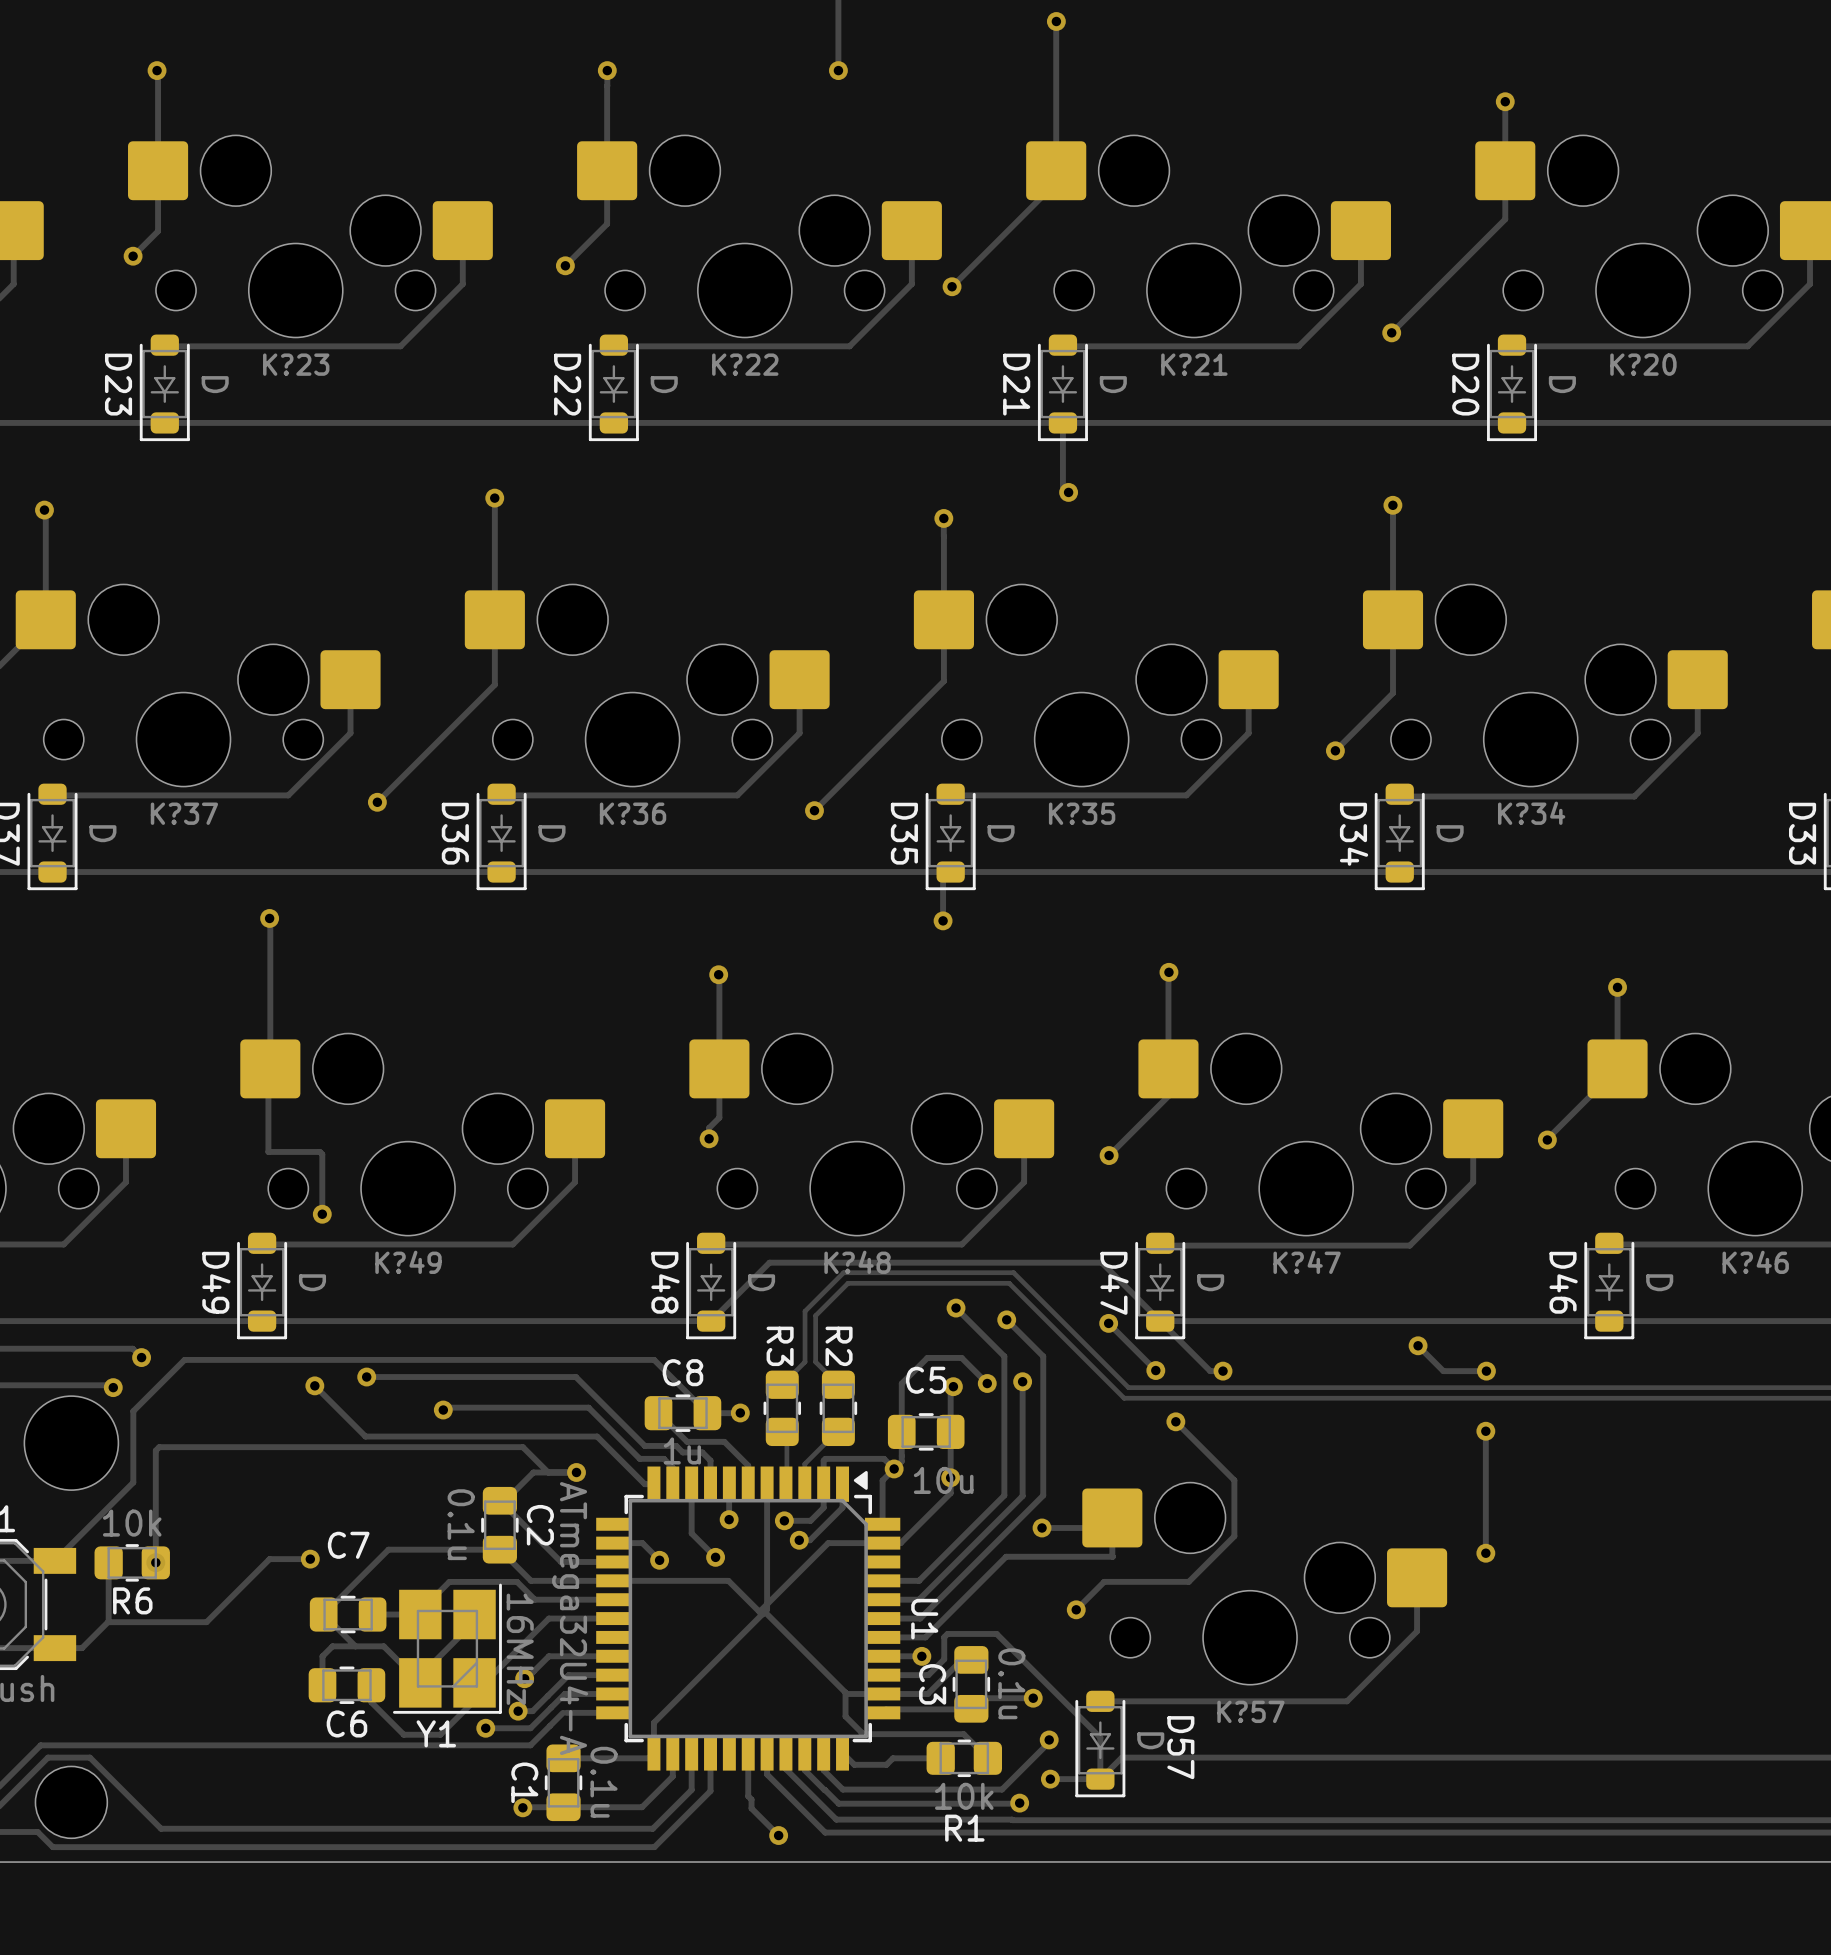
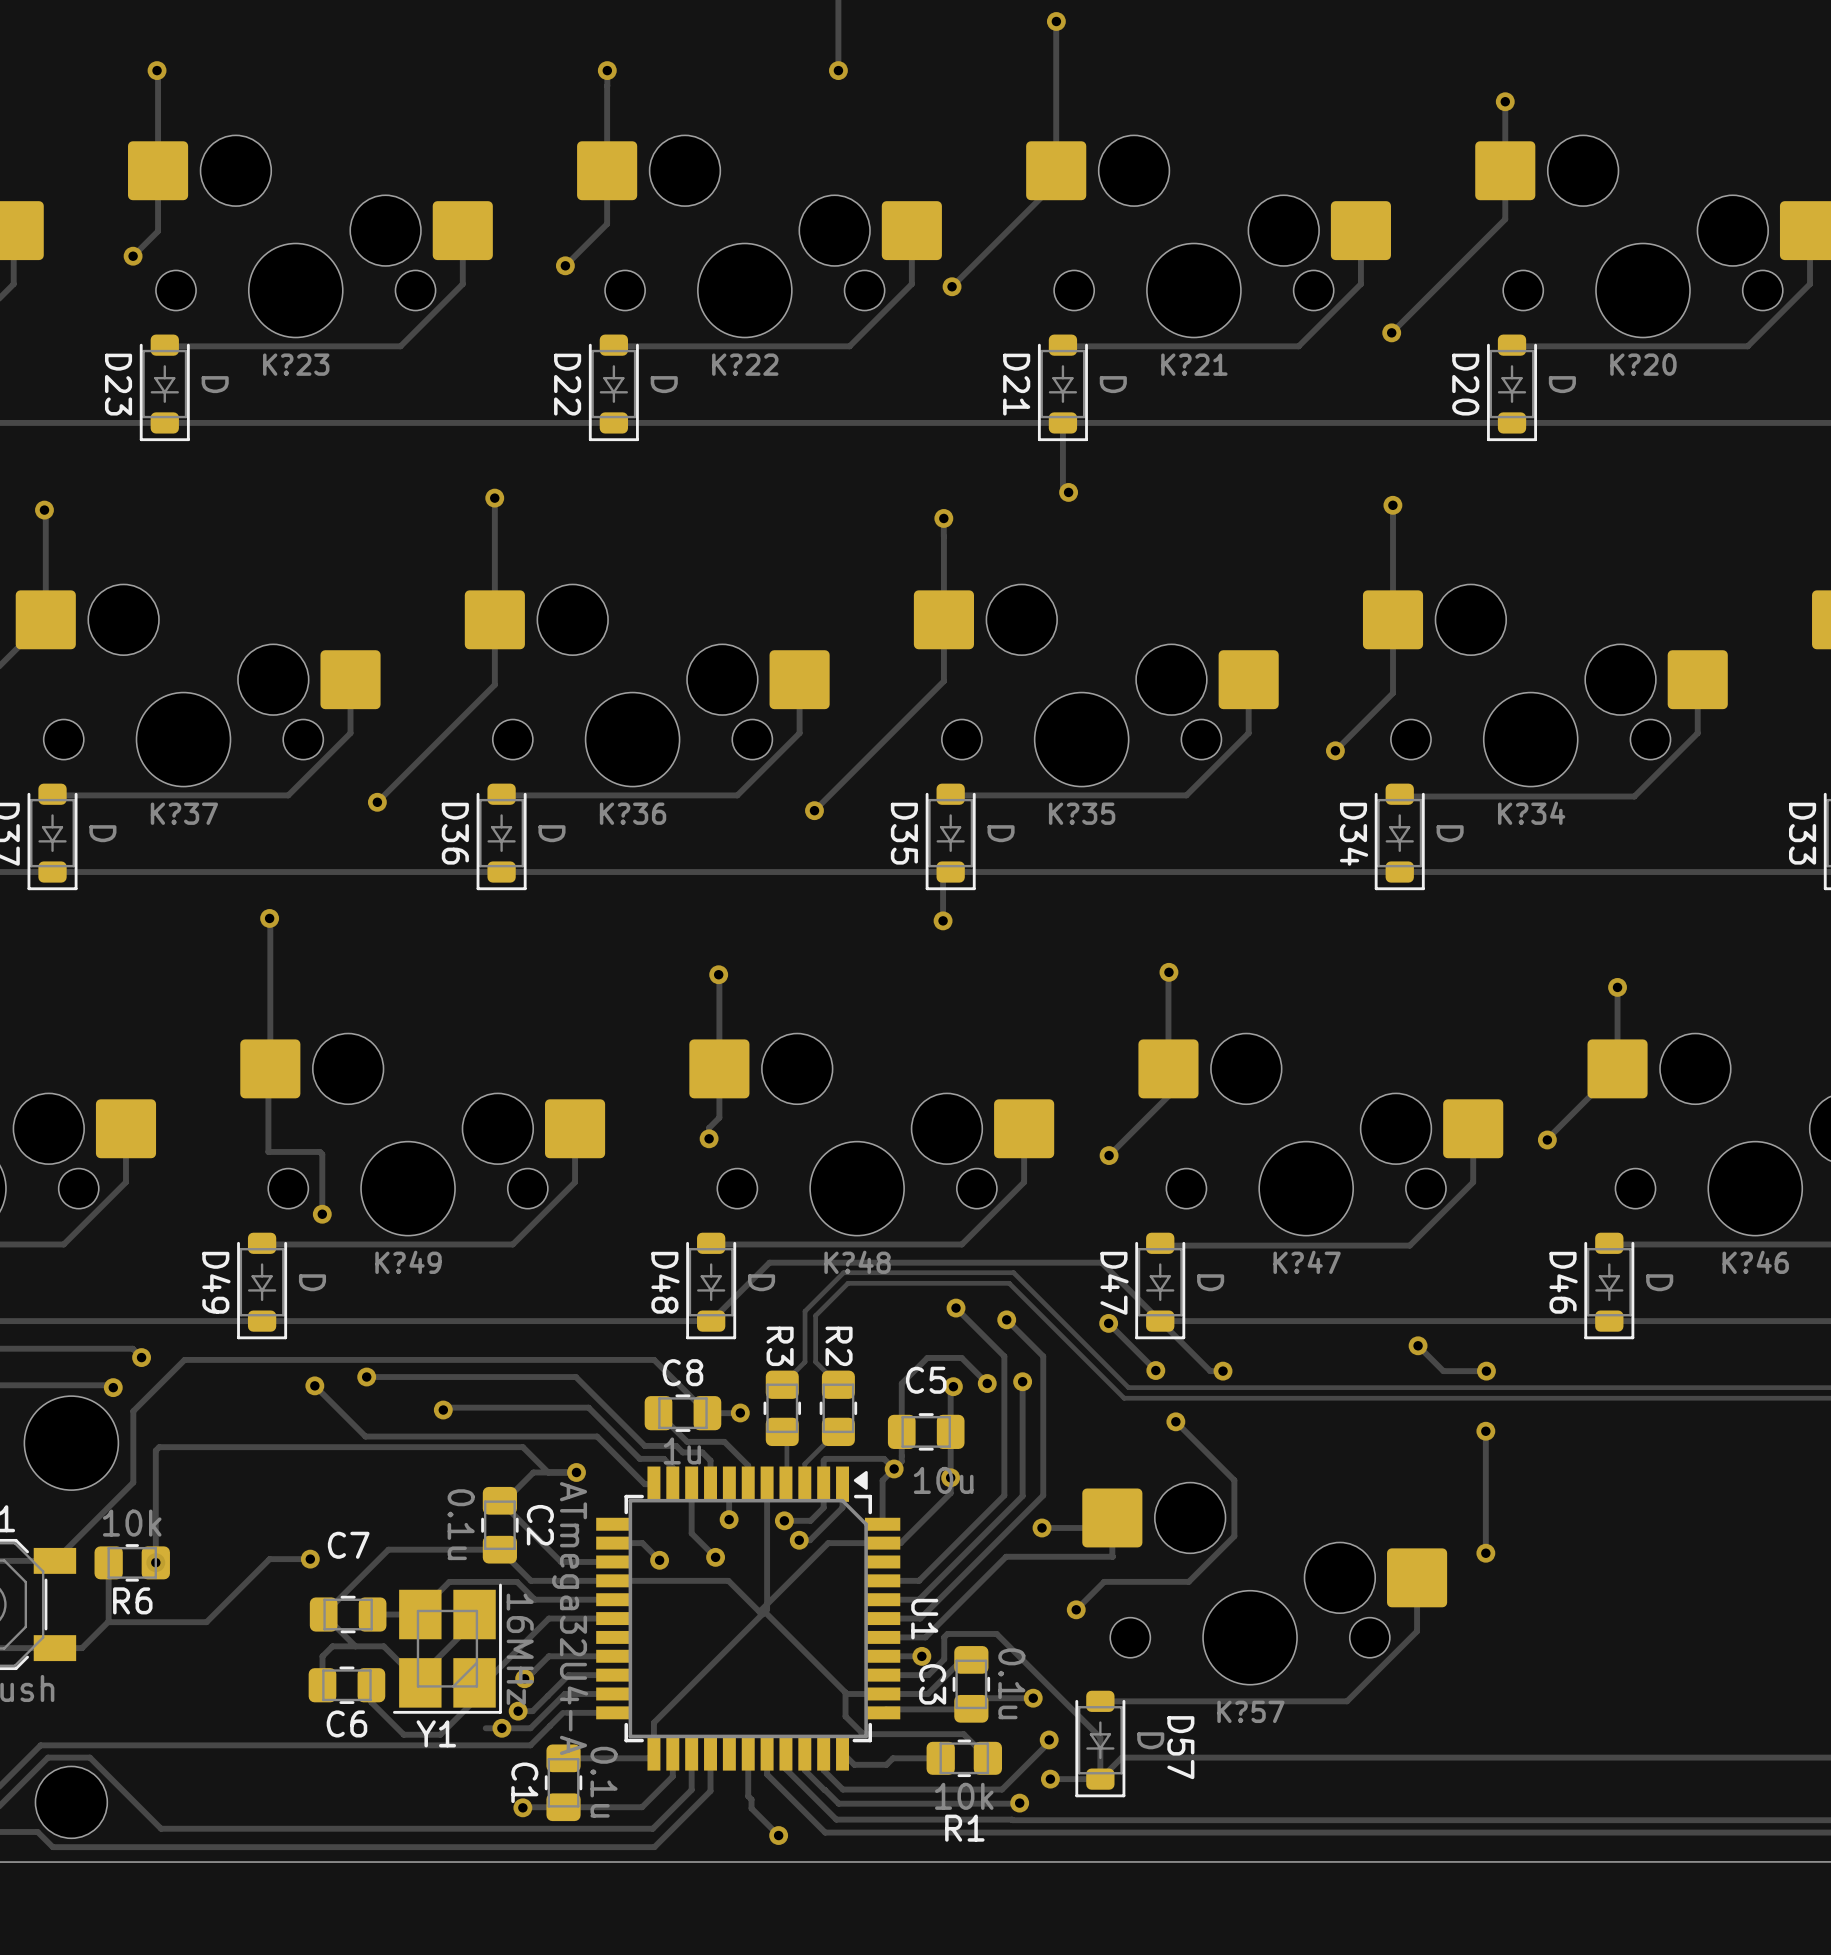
via position: (485, 1728) -> (501, 1728)

